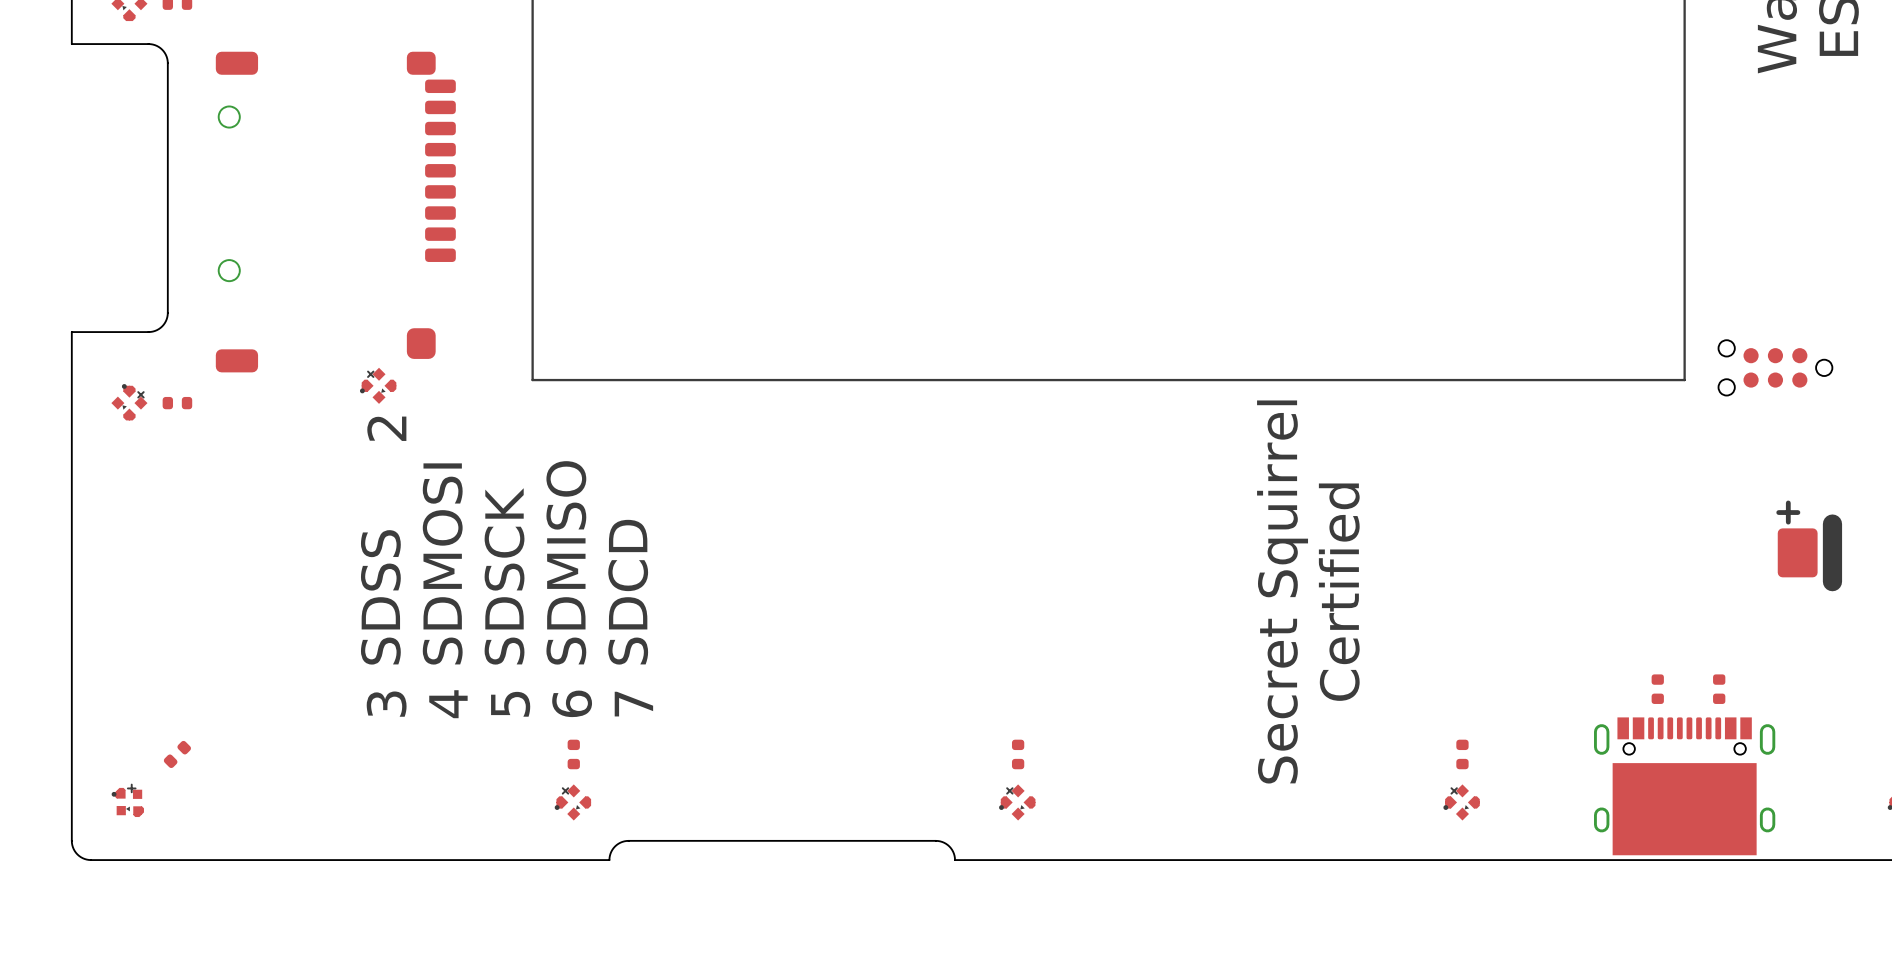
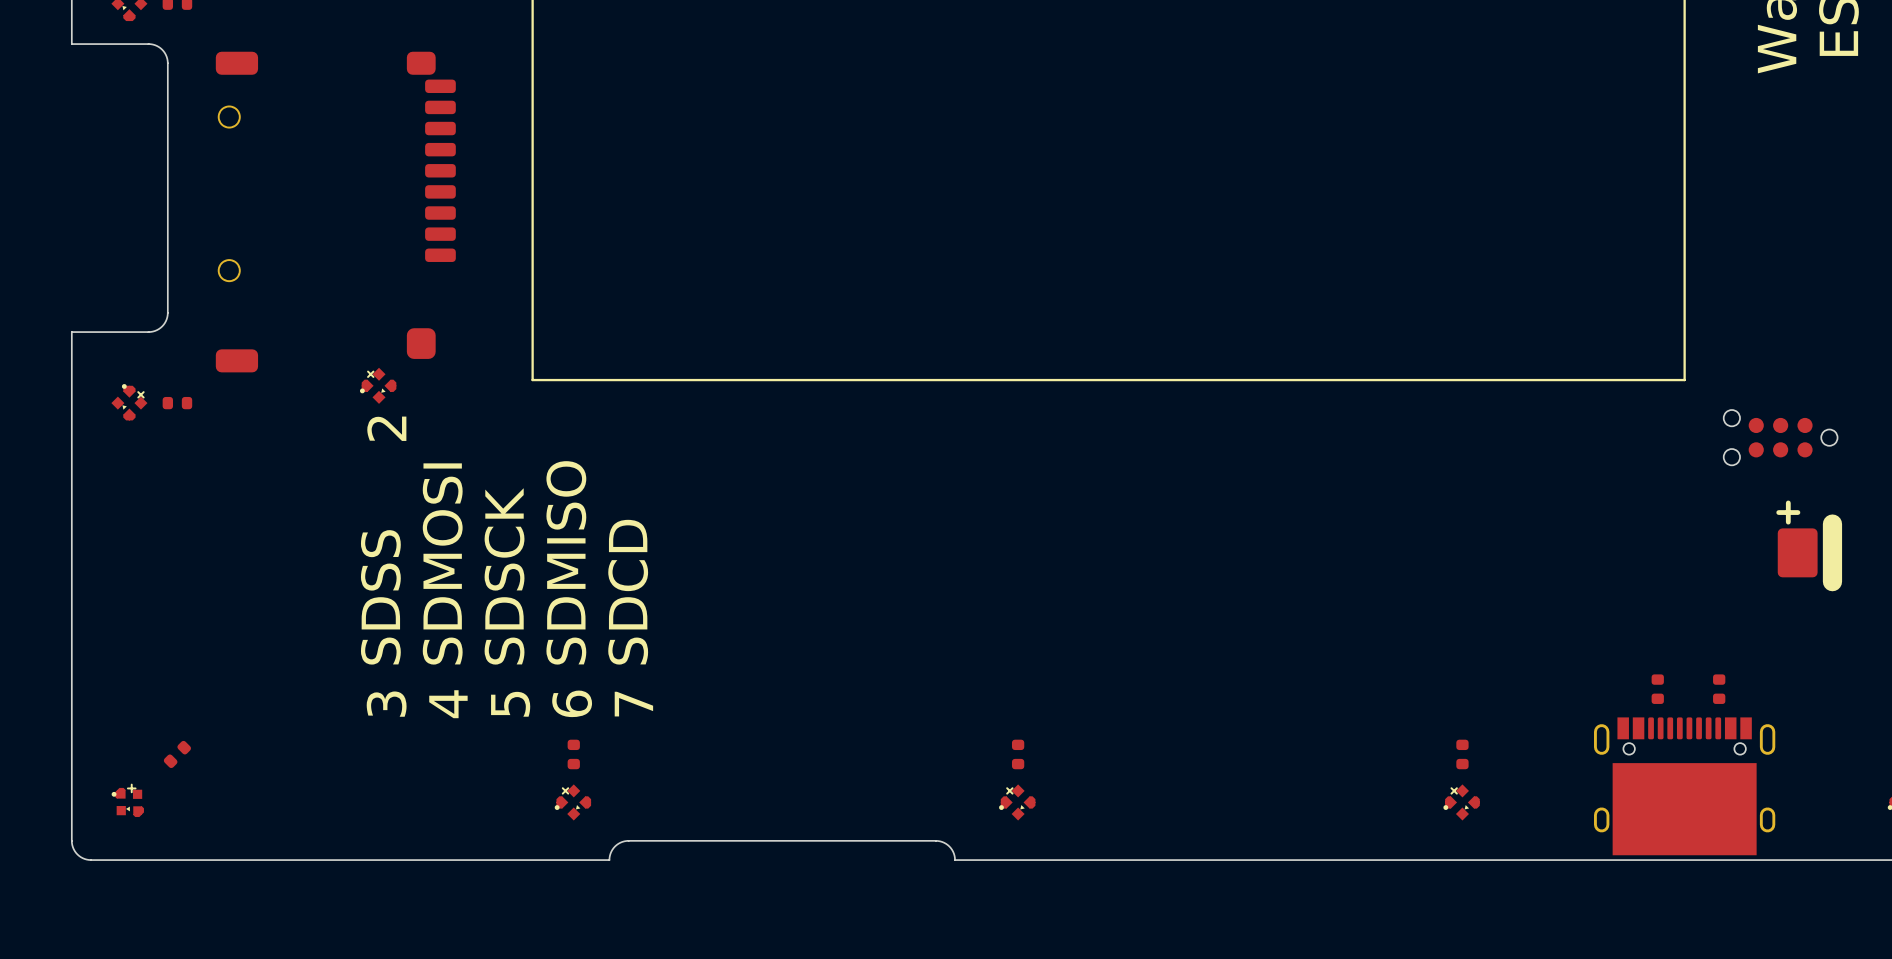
part position: (1775, 367) -> (1780, 437)
text: Secret Squirrel (1282, 591) -> none
text: Certified (1339, 592) -> none

